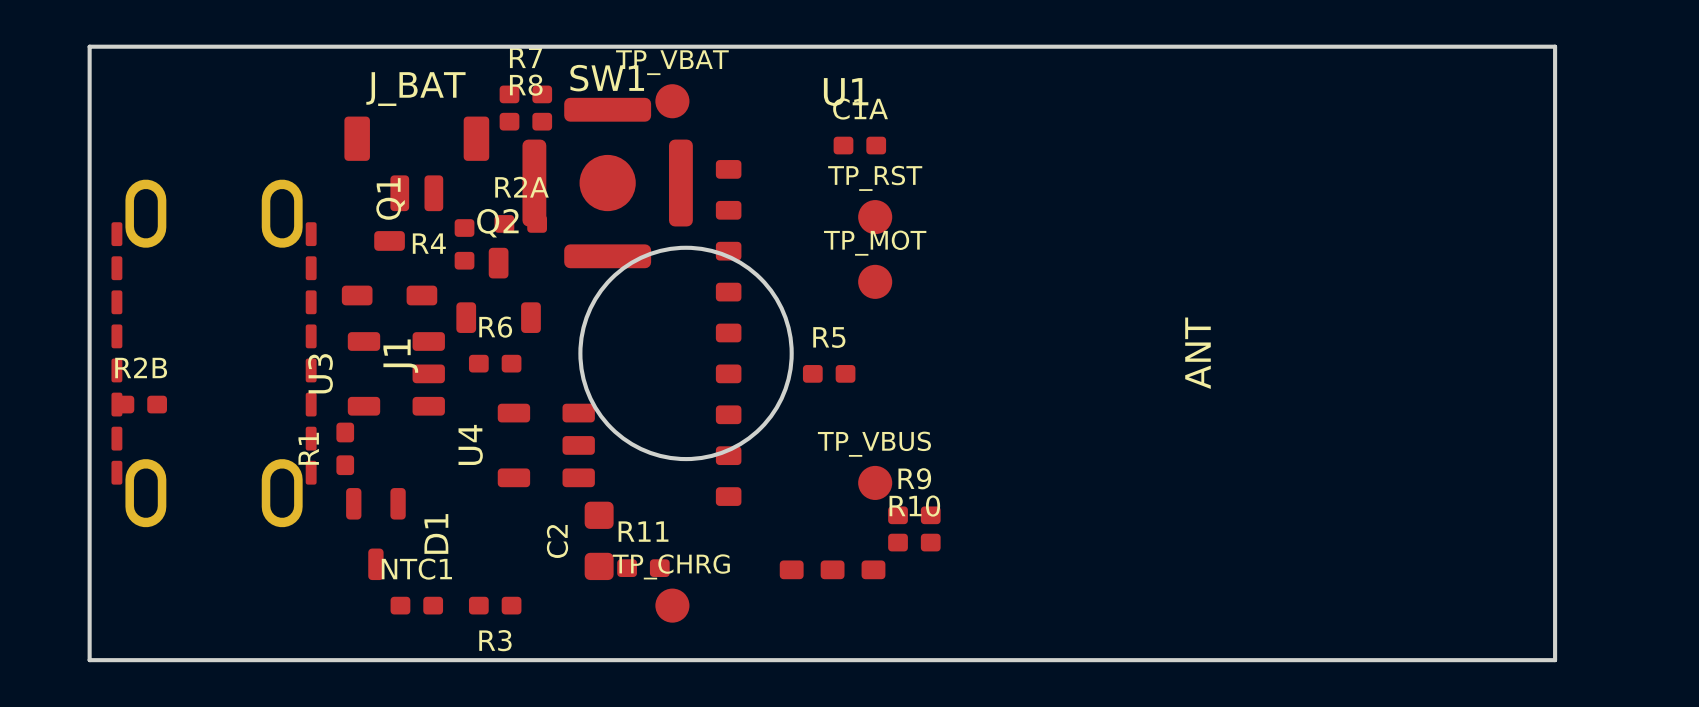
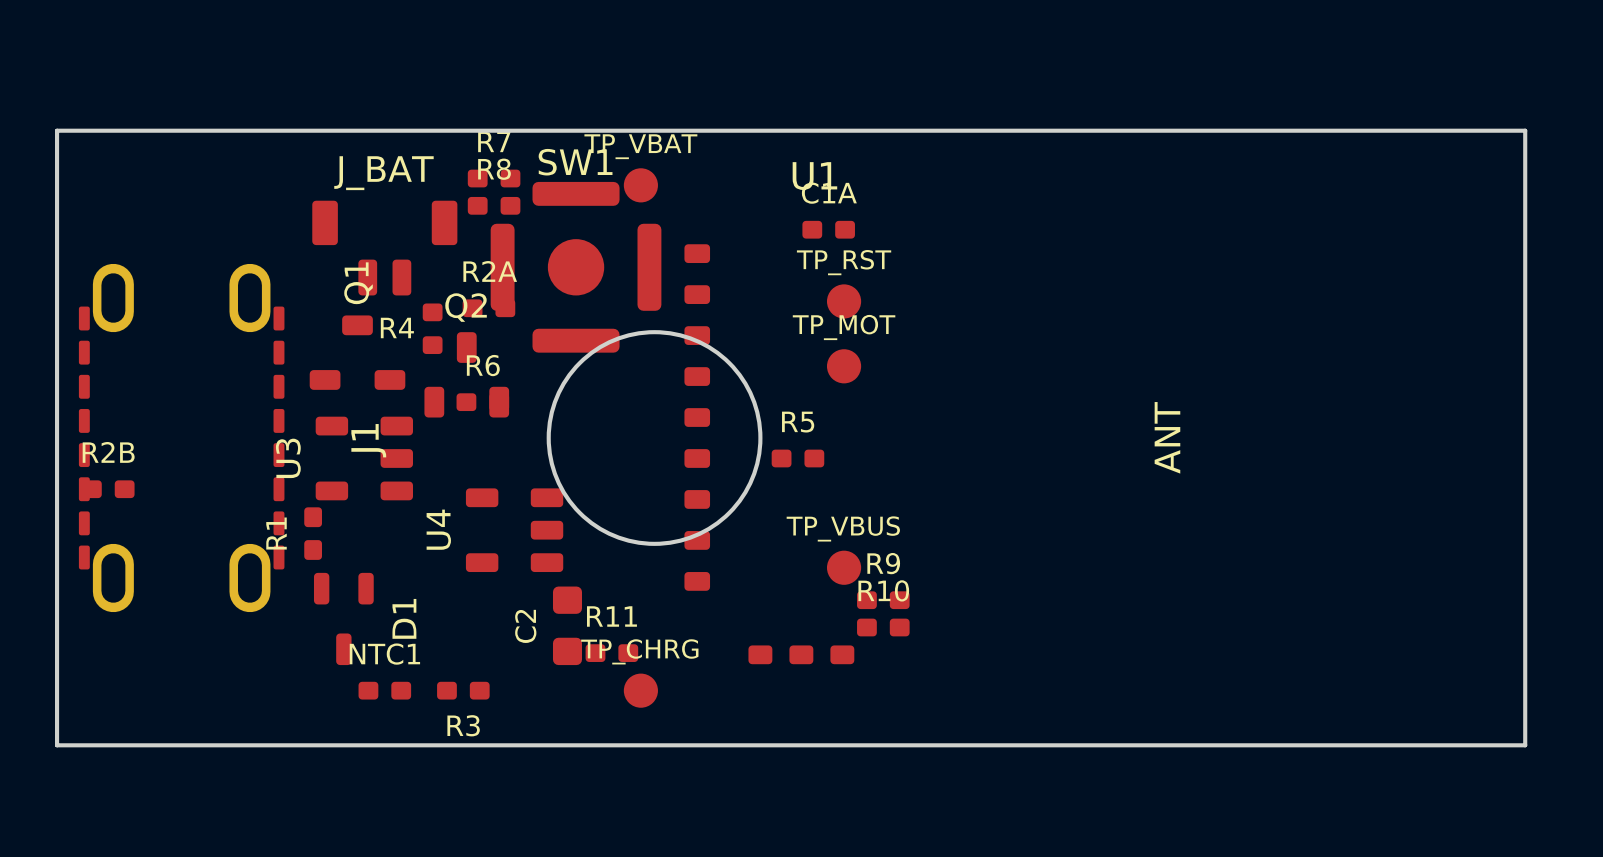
R6 position: (495, 363) -> (482, 402)

